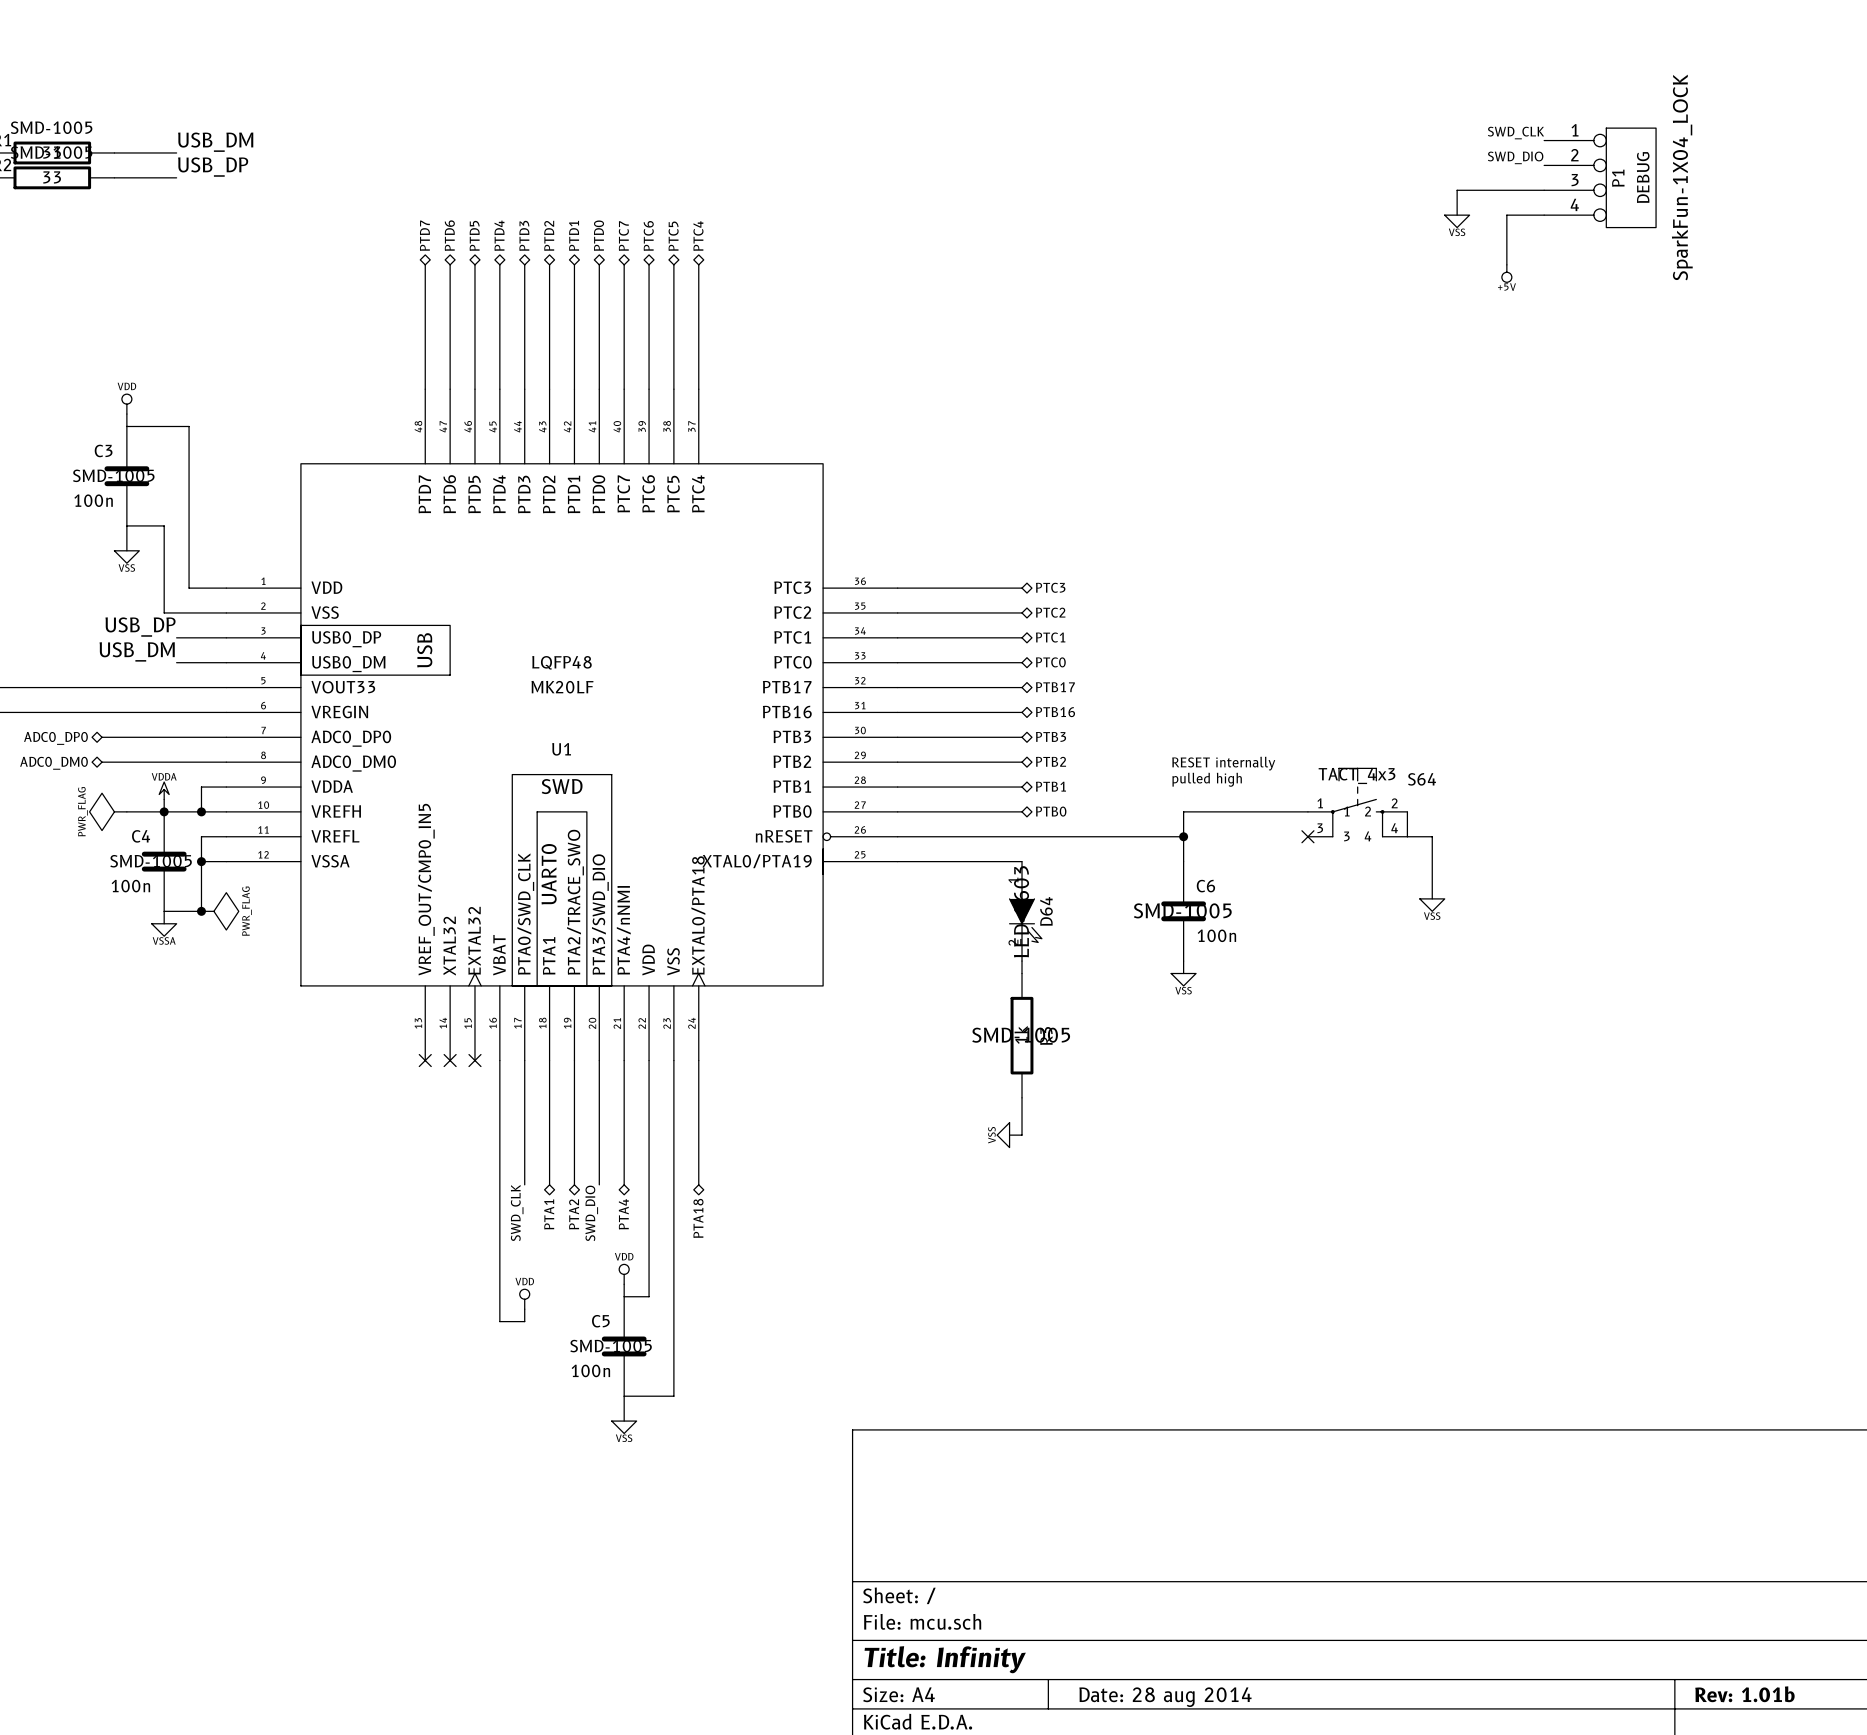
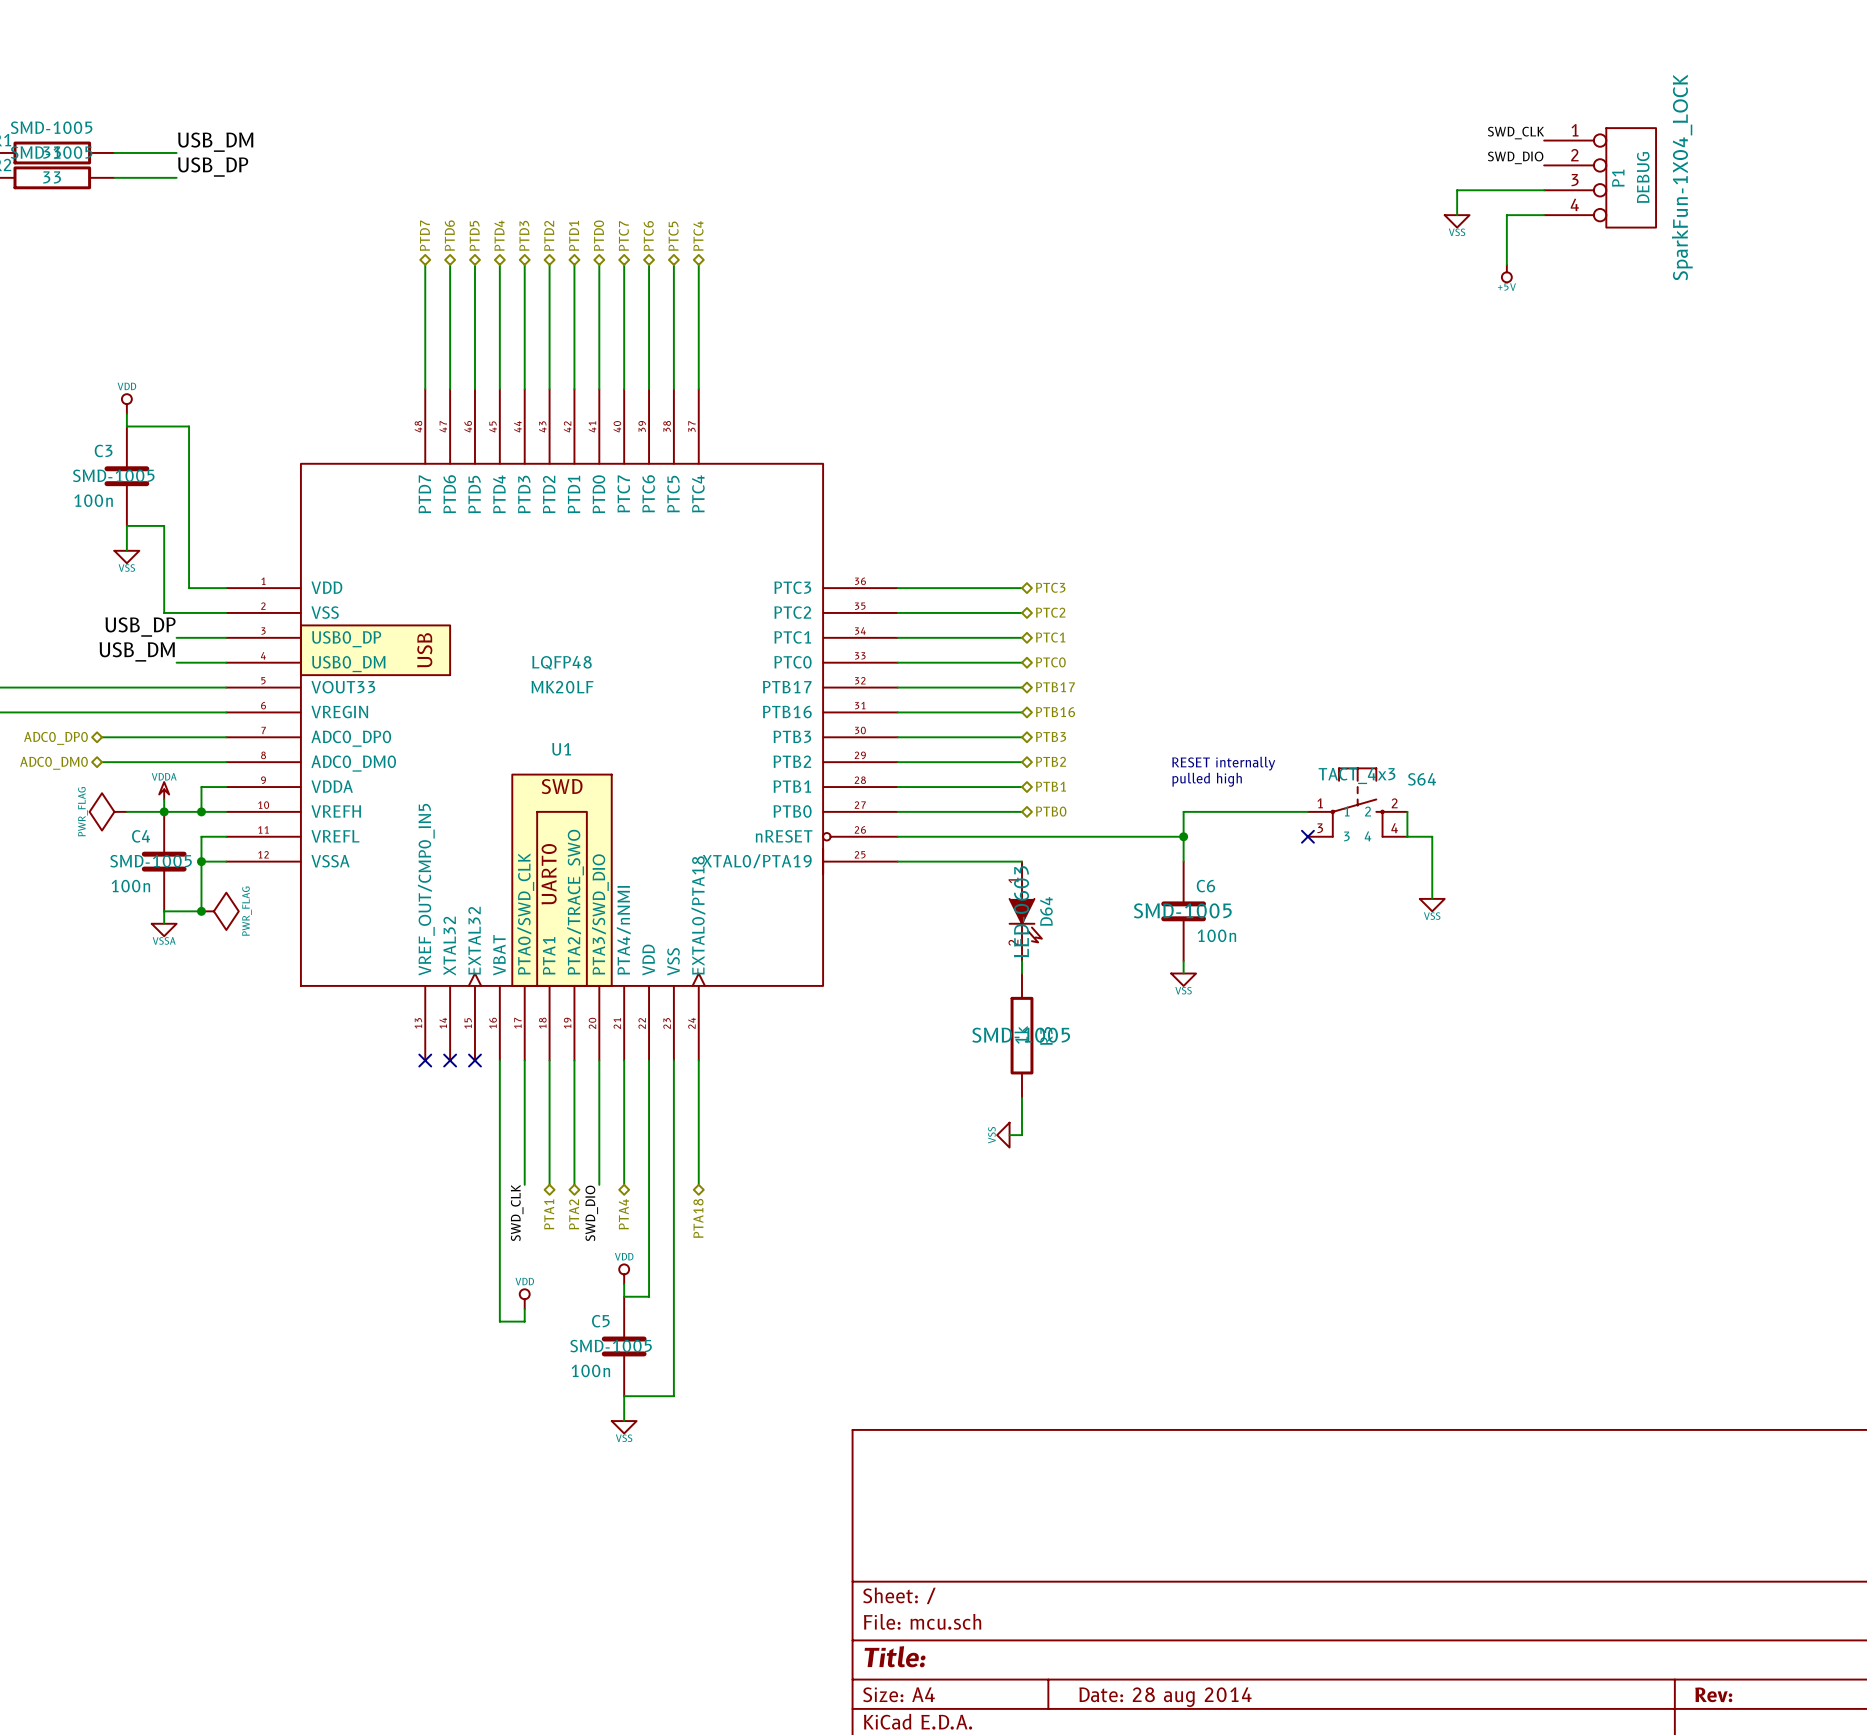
title block: Title: Infinity (945, 1659) -> Title: (895, 1656)
title block: Rev: 1.01b (1744, 1694) -> Rev: (1713, 1694)

